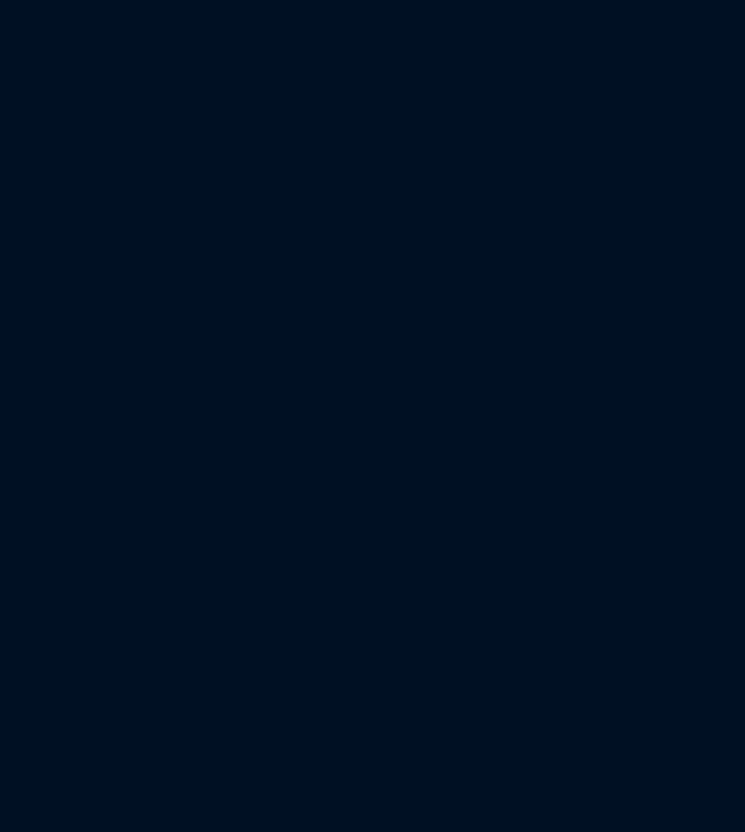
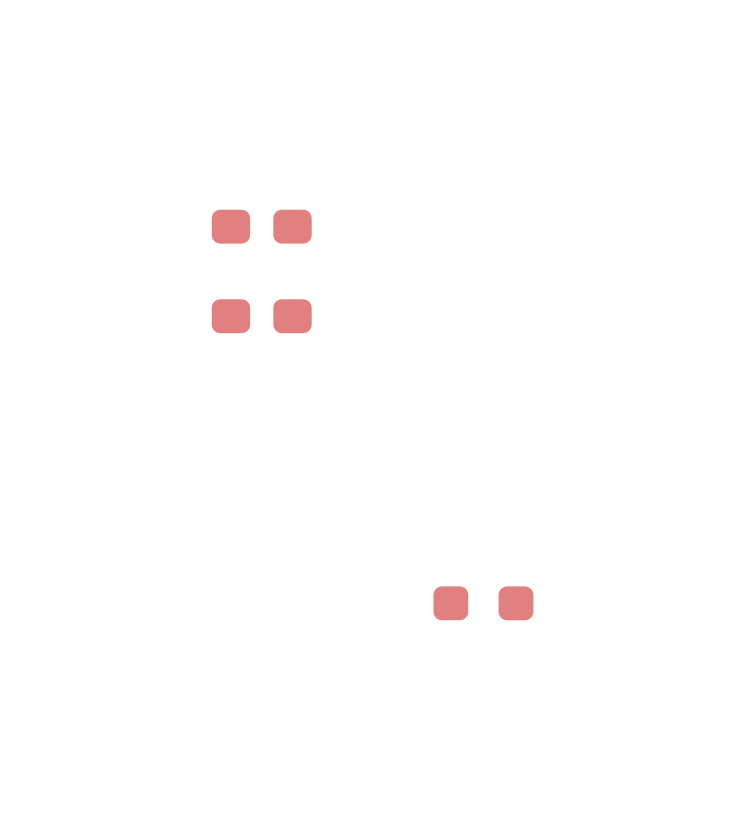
part: none -> (261, 226)
part: none -> (261, 316)
part: none -> (483, 603)

